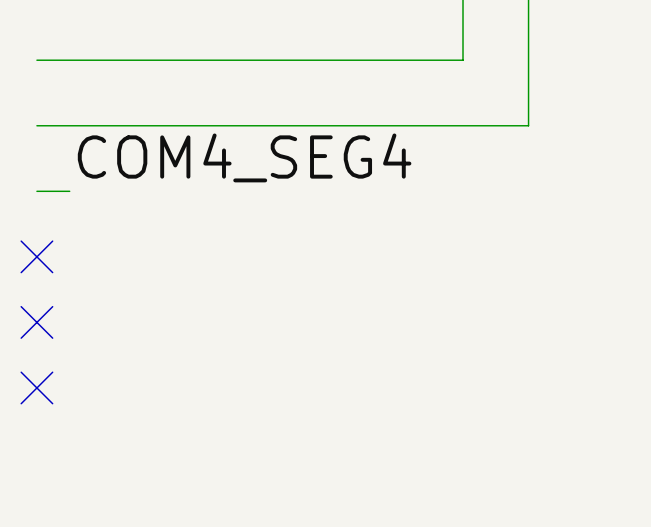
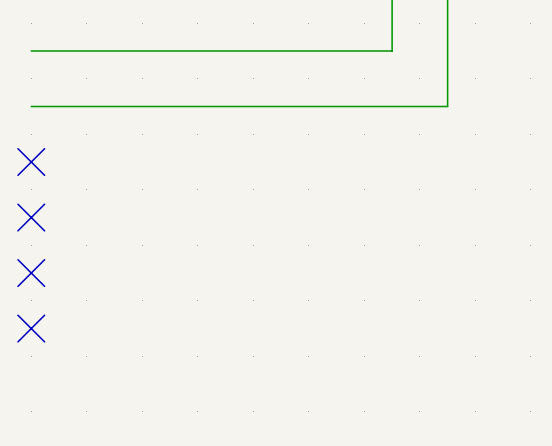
label: COM4_SEG4 (244, 157) -> none
wire: (36, 191) (69, 191) -> none
no-connect mark: none -> (31, 162)

